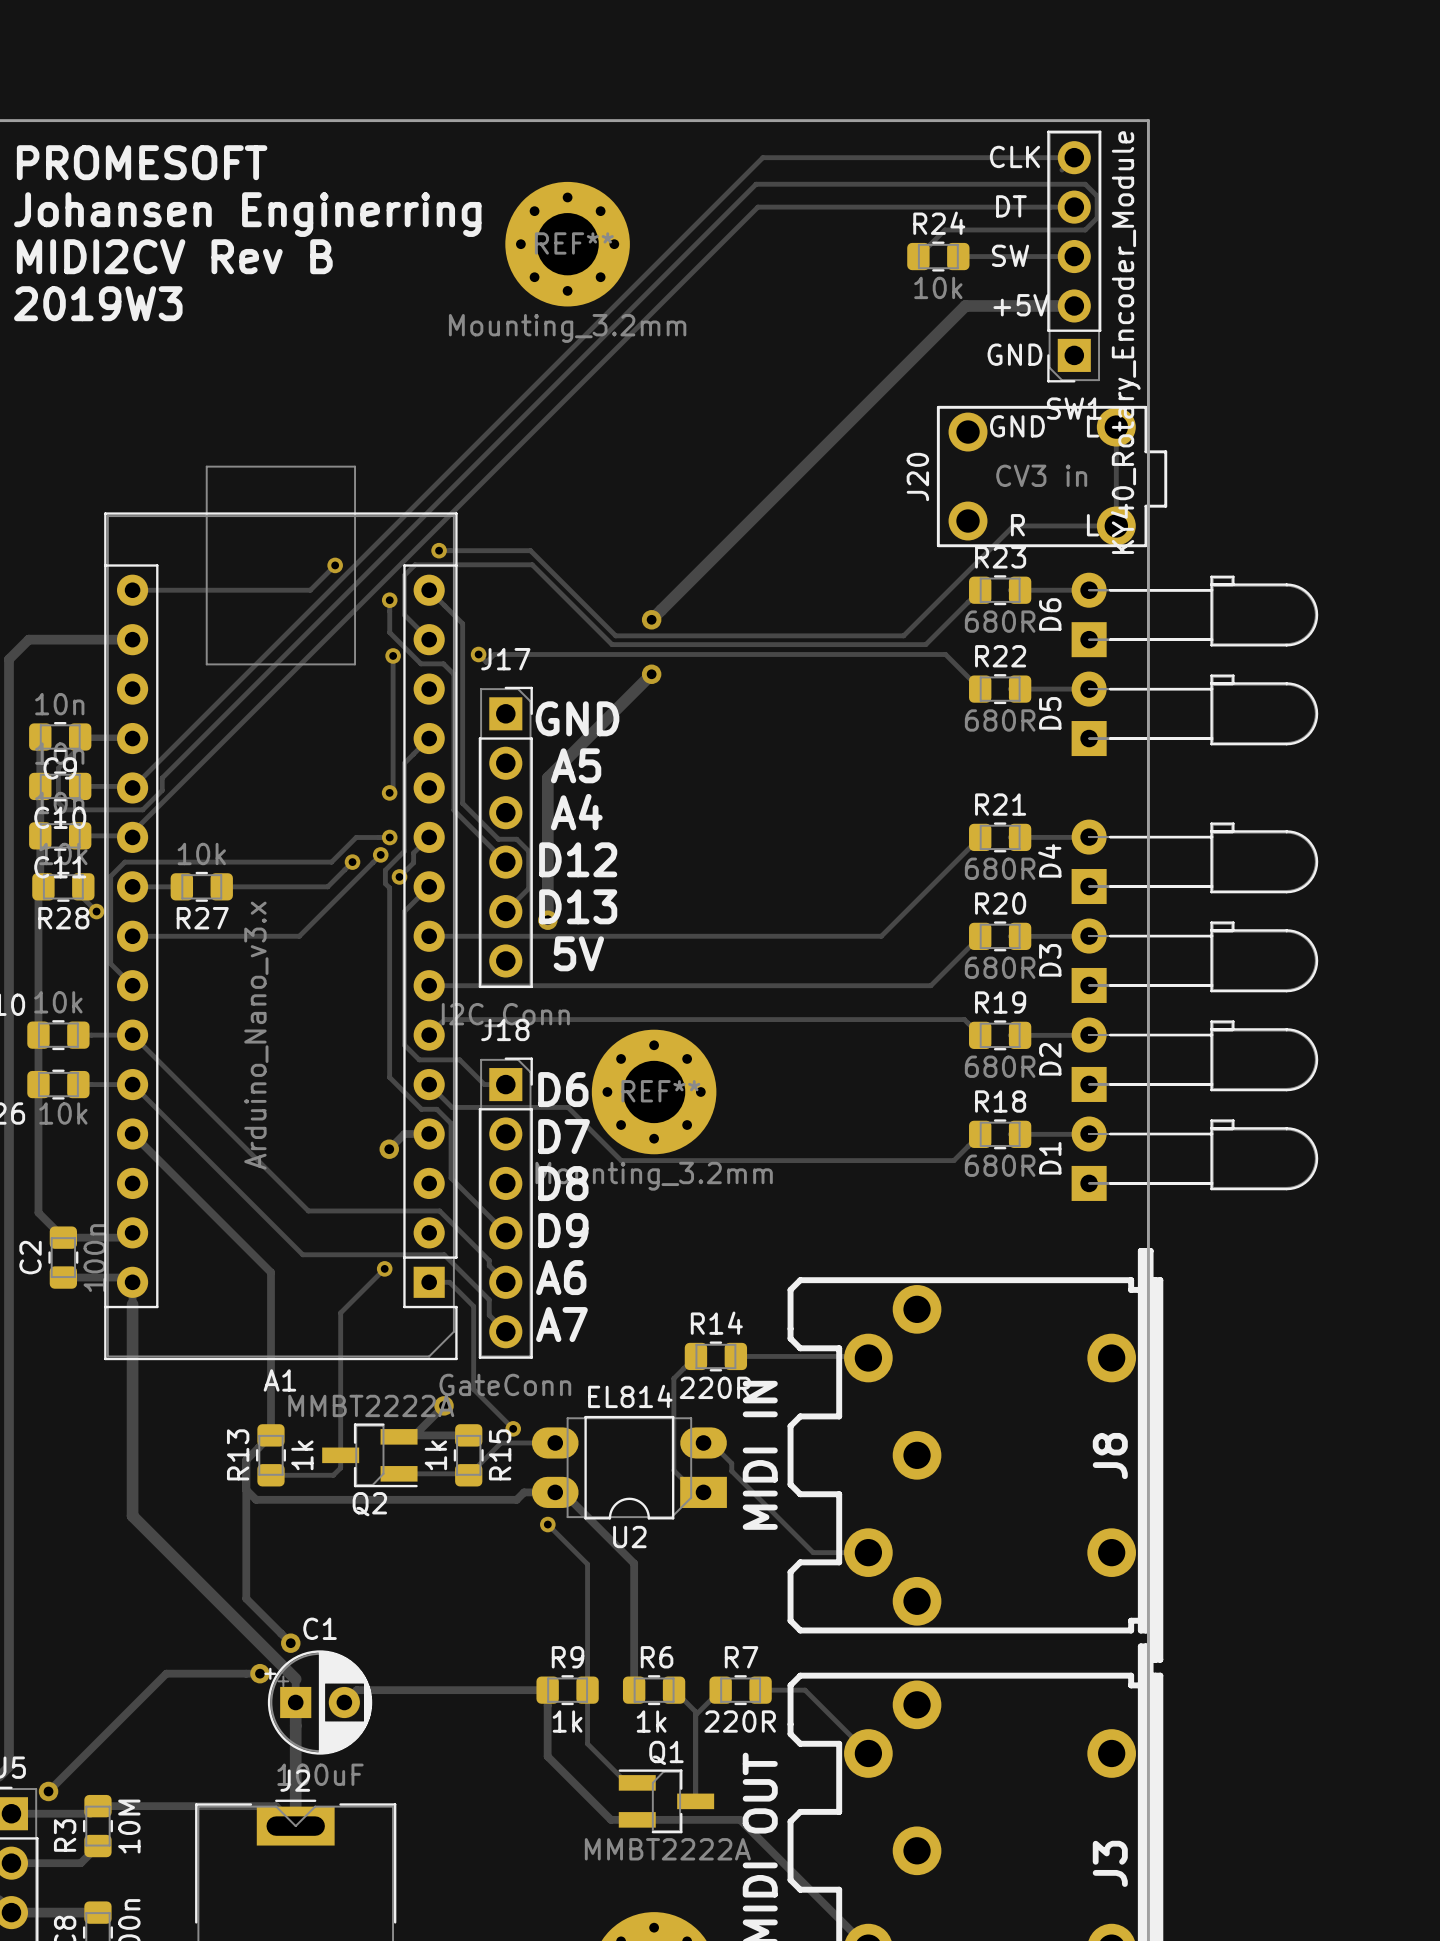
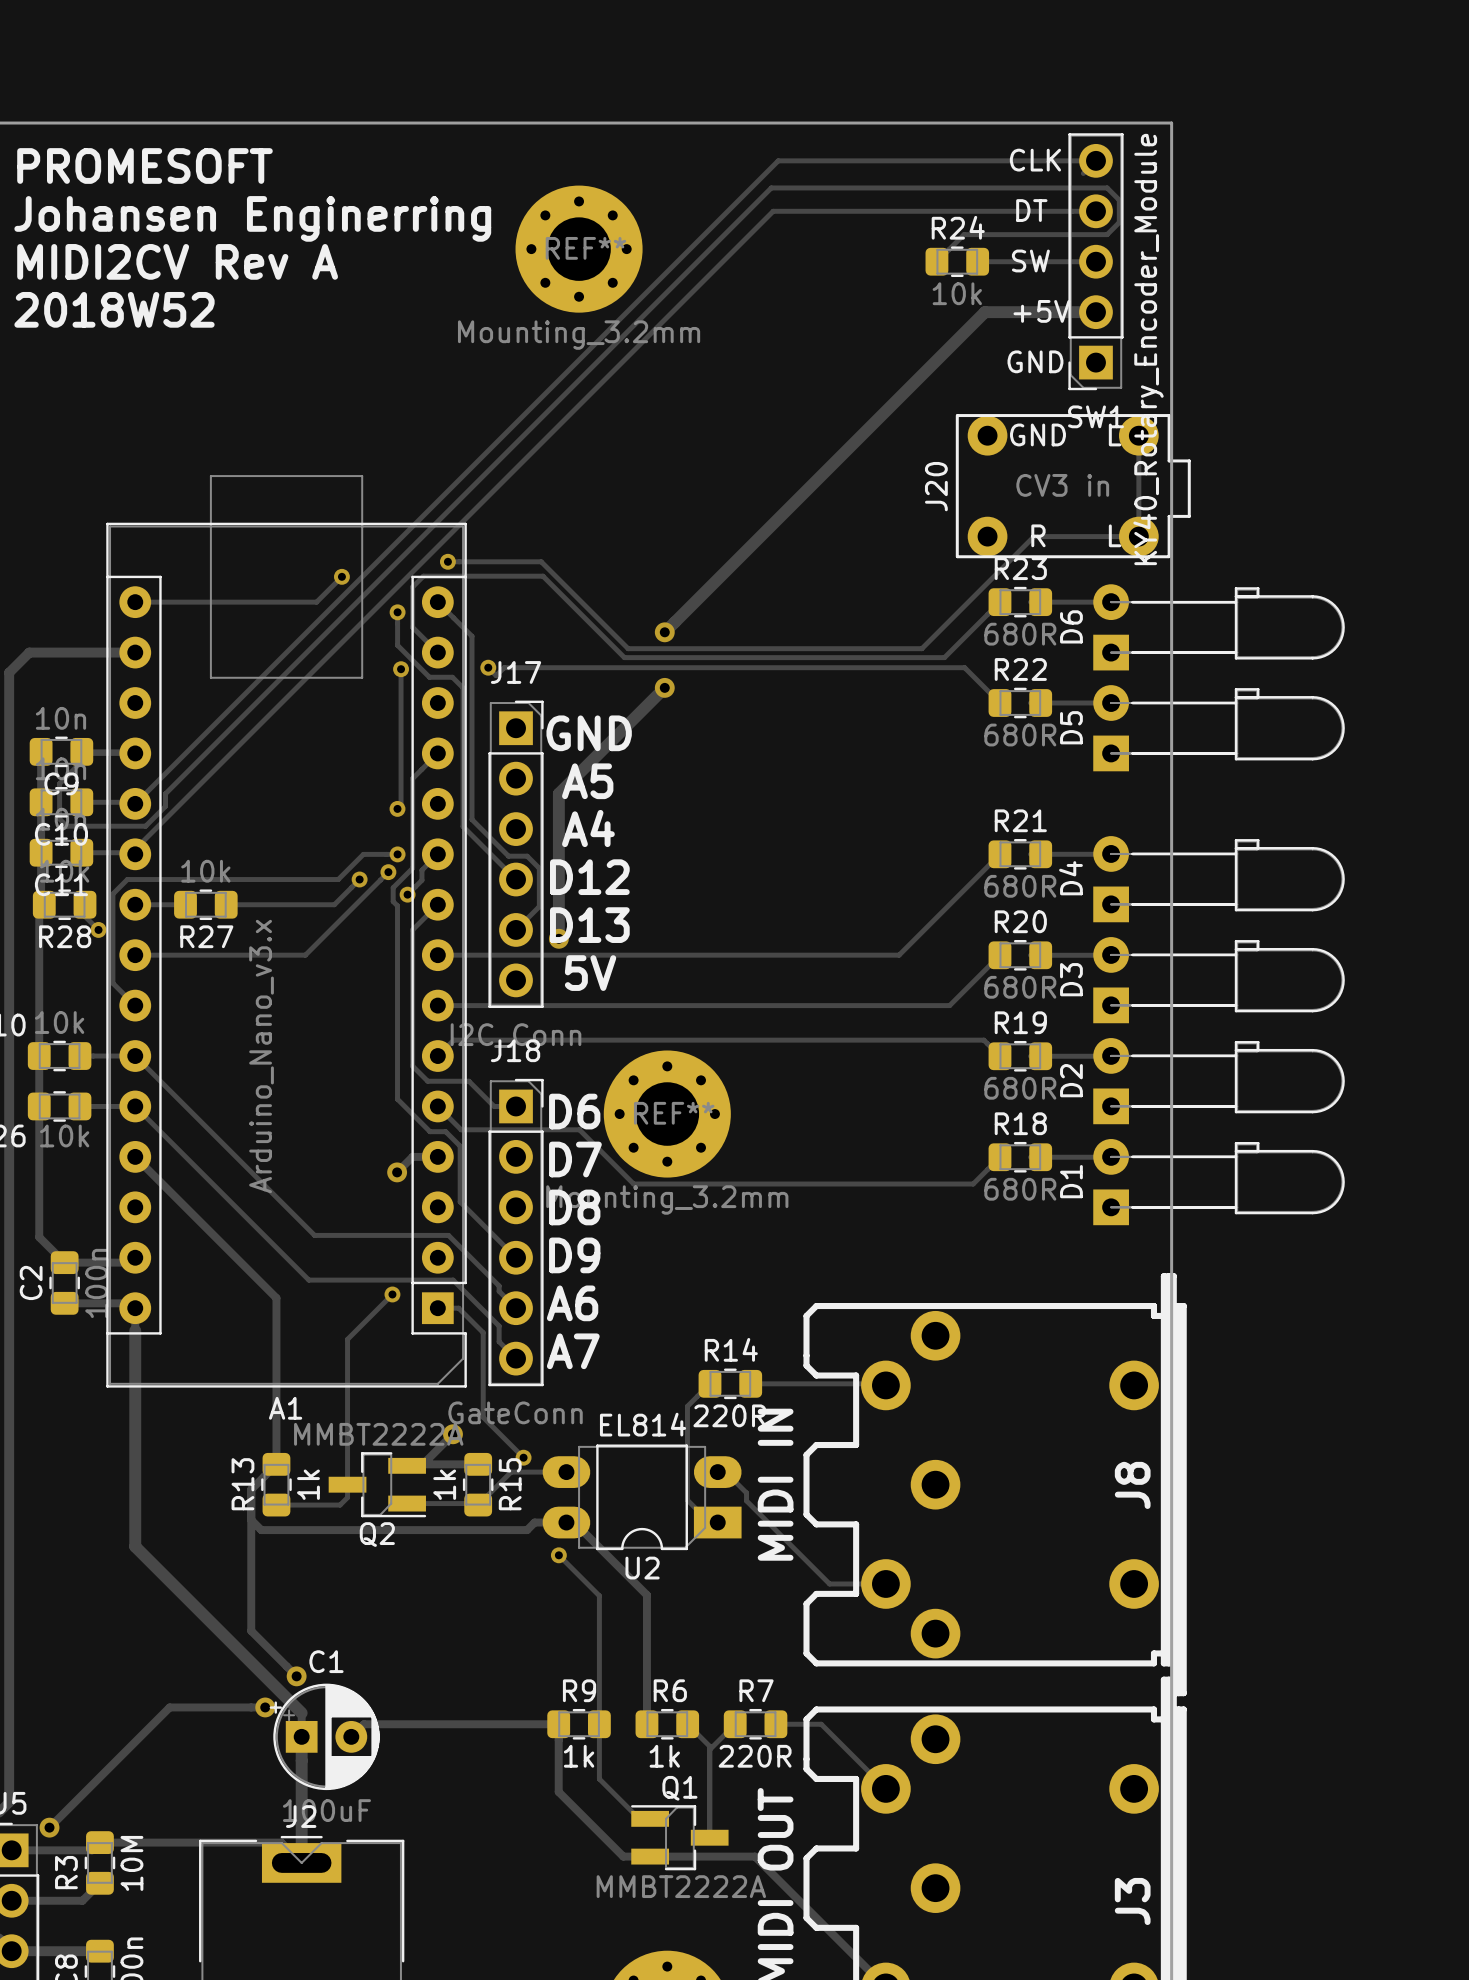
text: MIDI2CV Rev B (174, 256) -> MIDI2CV Rev A (177, 261)
text: 2019W3 (98, 303) -> 2018W52 (114, 309)
J20 footprint: [936, 405, 1168, 548] -> [955, 414, 1191, 559]

